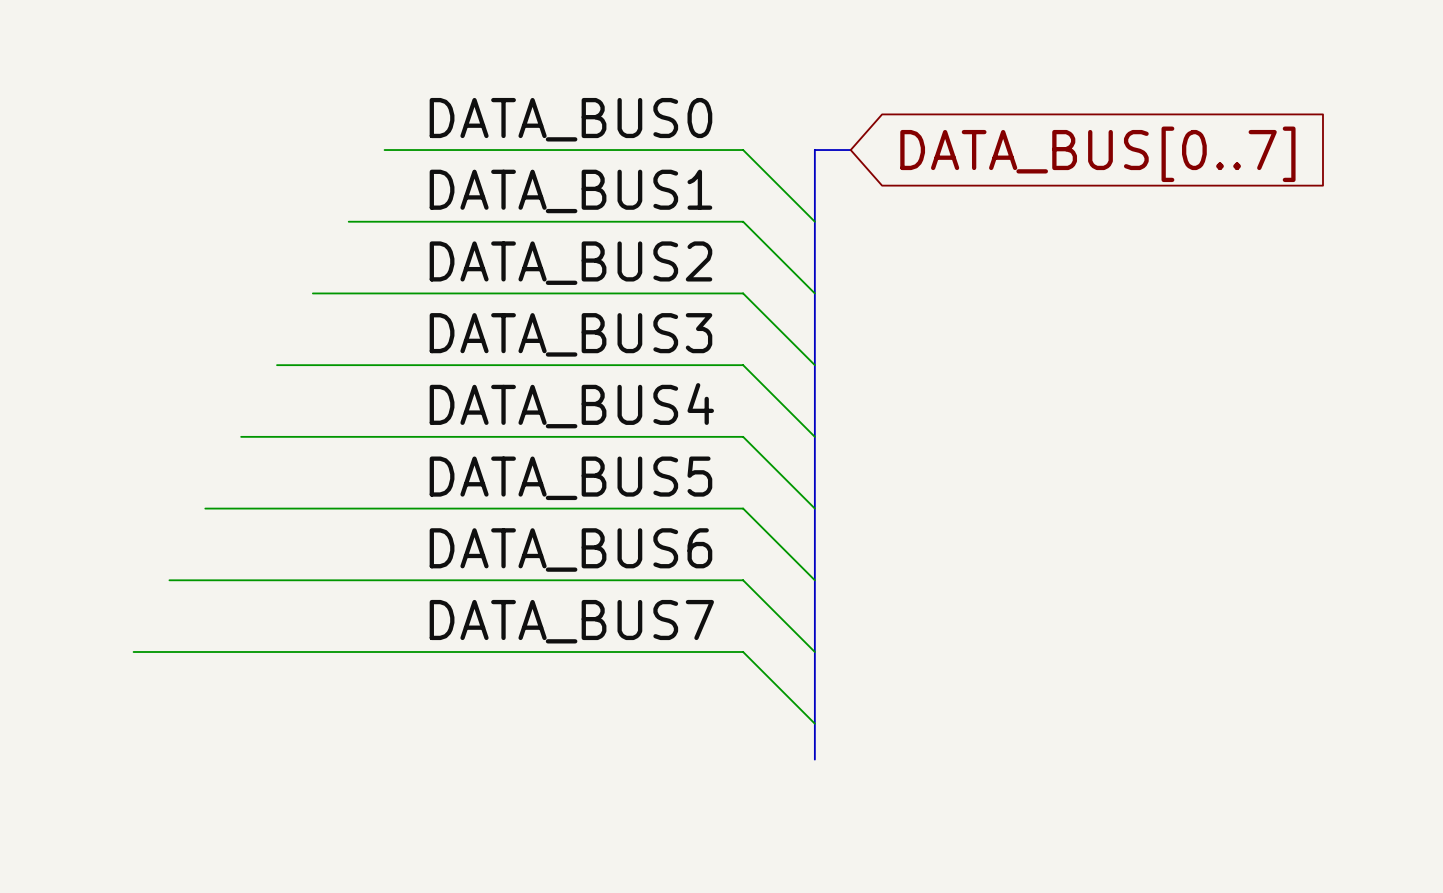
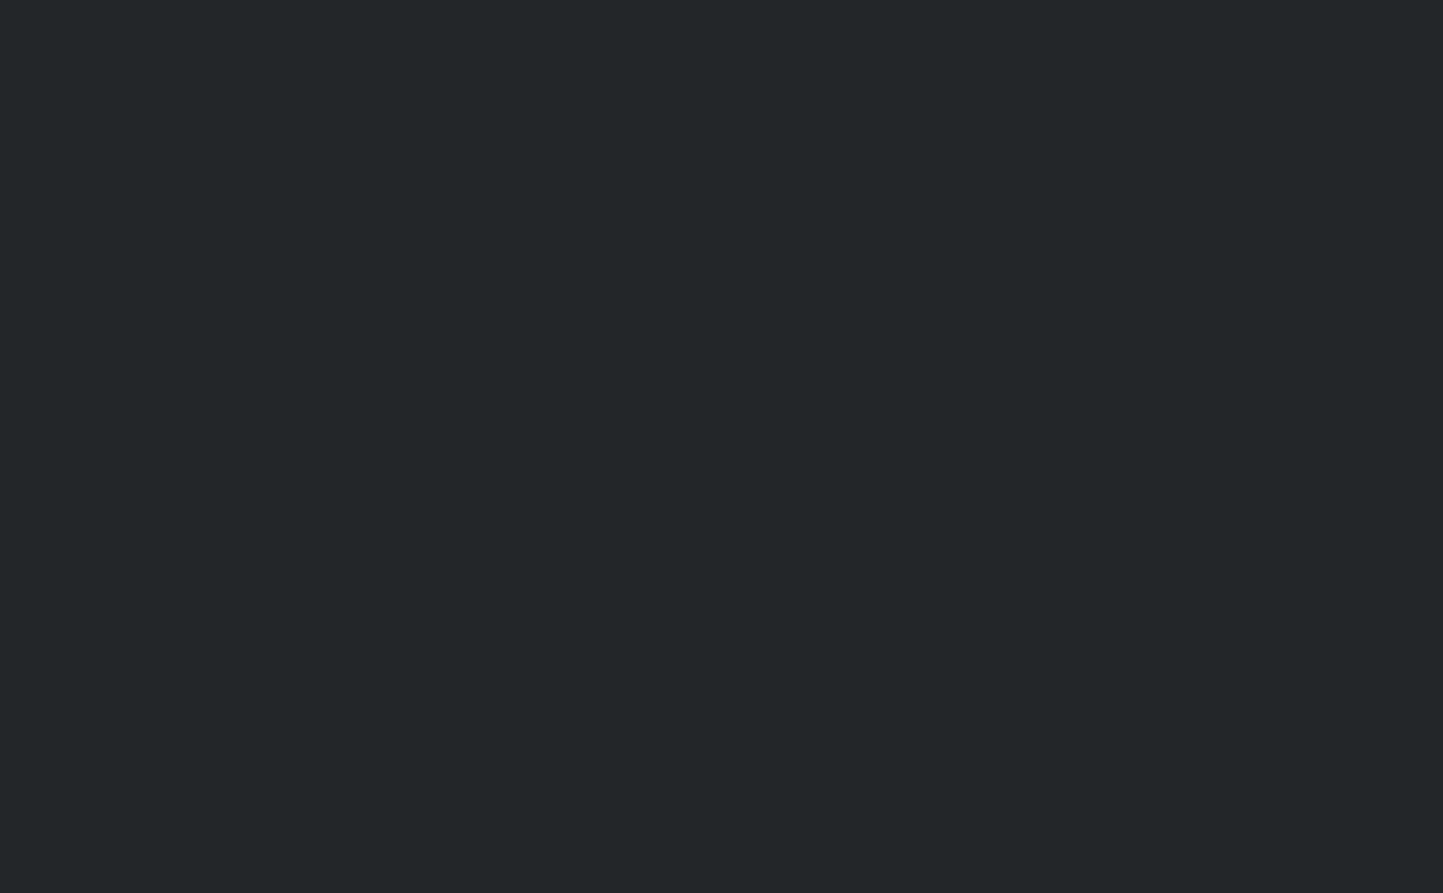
label: DATA_BUS0 (570, 119) -> none
wire: (384, 150) (743, 150) (814, 221) -> none
bus: (850, 150) (814, 150) (814, 759) -> none
global label: DATA_BUS[0..7] (1097, 154) -> none
label: DATA_BUS1 (570, 191) -> none
wire: (348, 221) (743, 221) (814, 293) -> none
label: DATA_BUS2 (570, 263) -> none
wire: (312, 293) (743, 293) (814, 365) -> none
label: DATA_BUS3 (570, 334) -> none
wire: (277, 365) (743, 365) (814, 436) -> none
label: DATA_BUS4 (571, 405) -> none
wire: (241, 436) (743, 436) (814, 508) -> none
label: DATA_BUS5 (570, 478) -> none
wire: (205, 508) (743, 508) (814, 580) -> none
label: DATA_BUS6 (570, 549) -> none
wire: (169, 580) (743, 580) (814, 651) -> none
label: DATA_BUS7 (571, 621) -> none
wire: (133, 651) (743, 651) (814, 723) -> none

